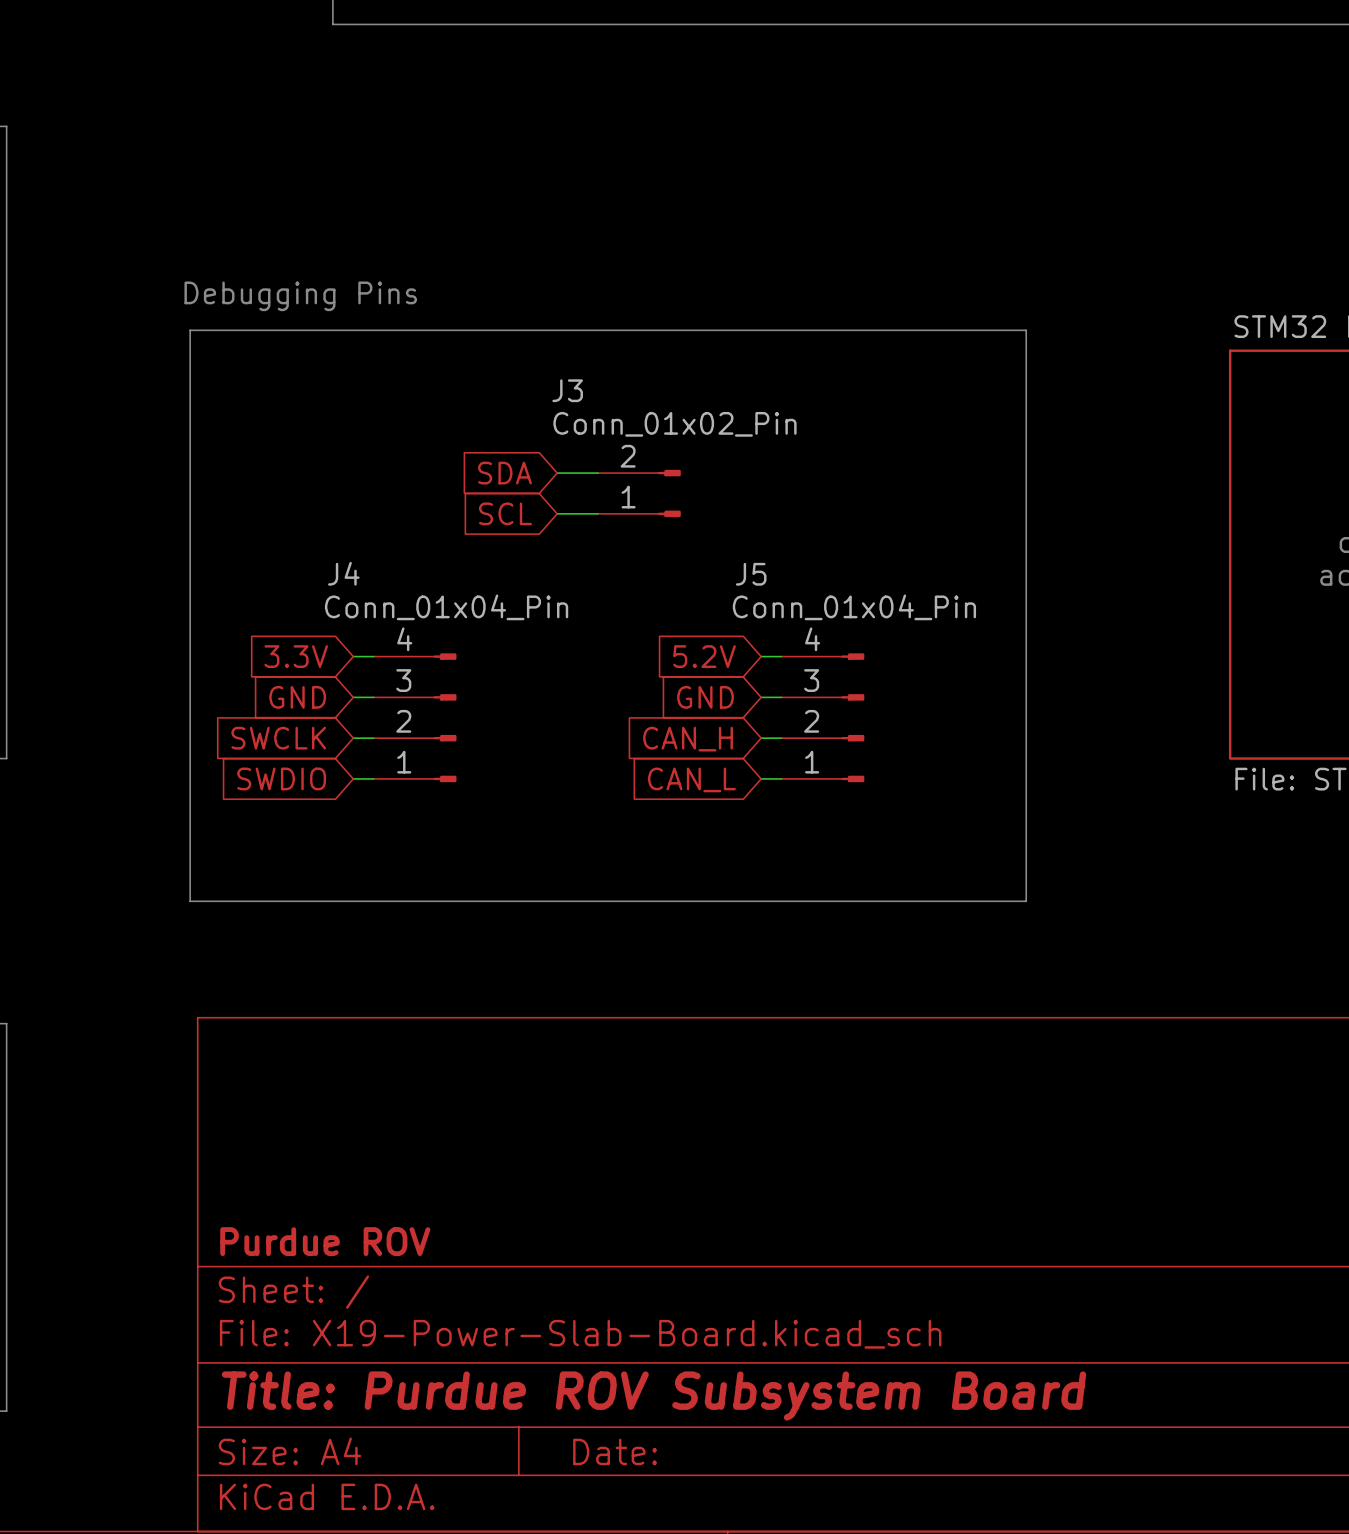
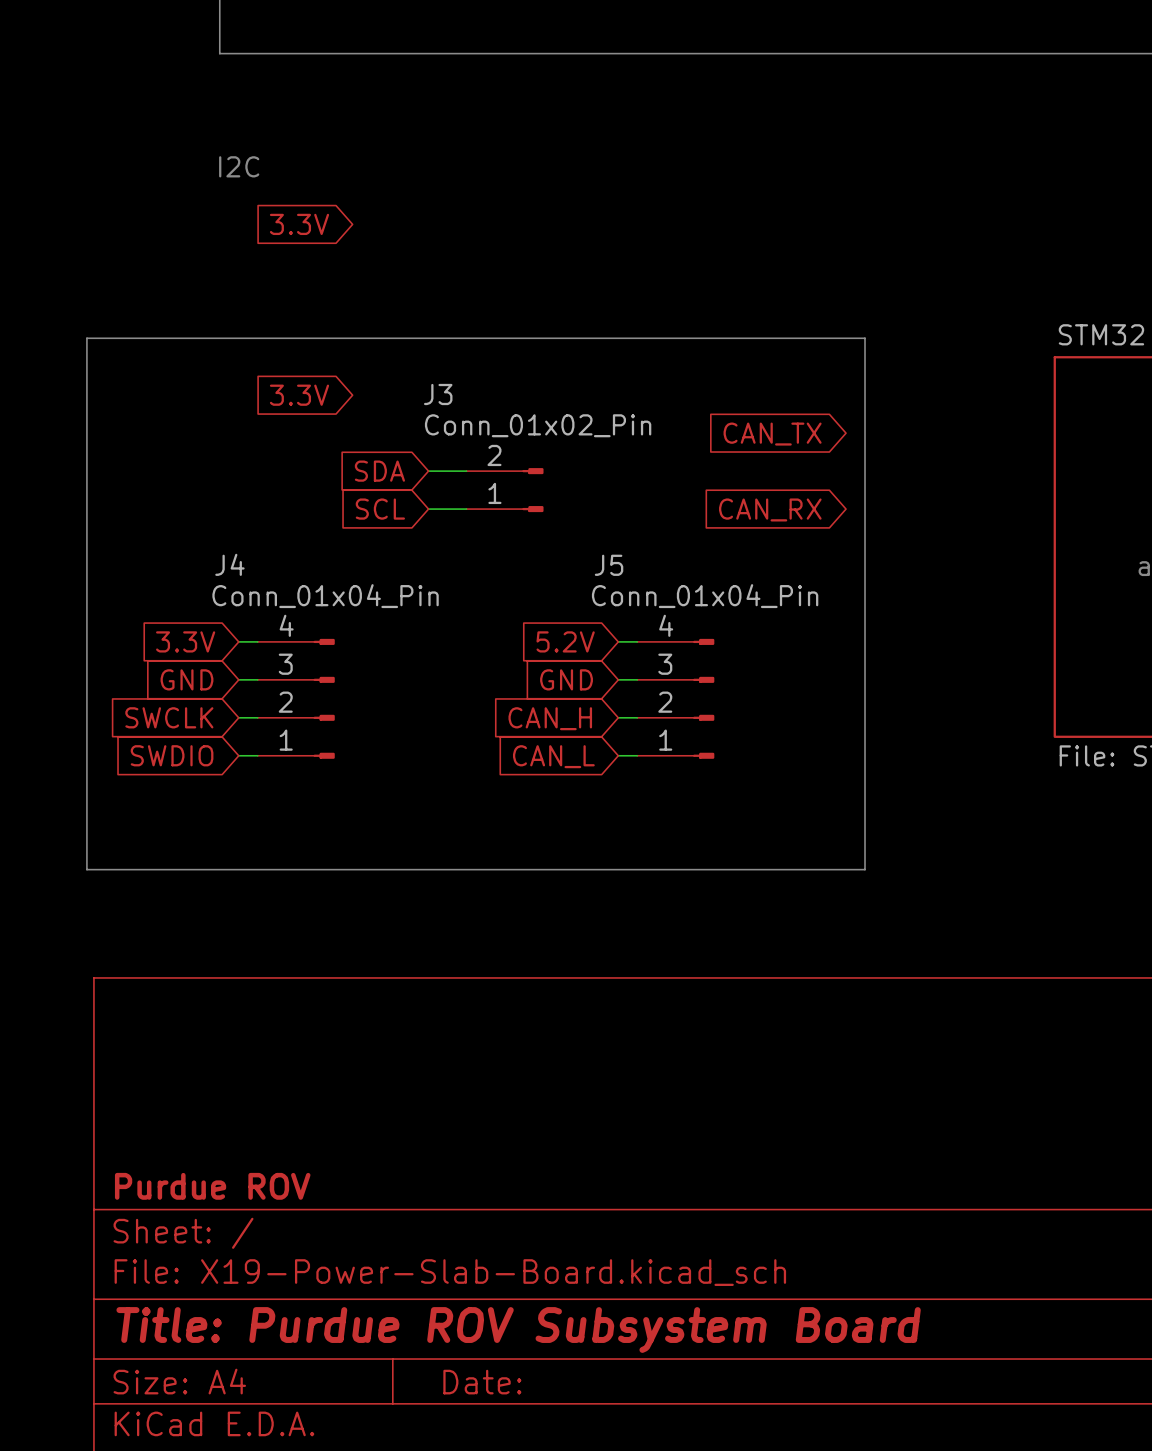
text: none -> I2C (239, 166)
global label: none -> 3.3V (299, 224)
text: Debugging Pins (300, 296) -> none
global label: none -> 3.3V (299, 395)
global label: none -> CAN_TX (772, 434)
global label: none -> CAN_RX (770, 509)

